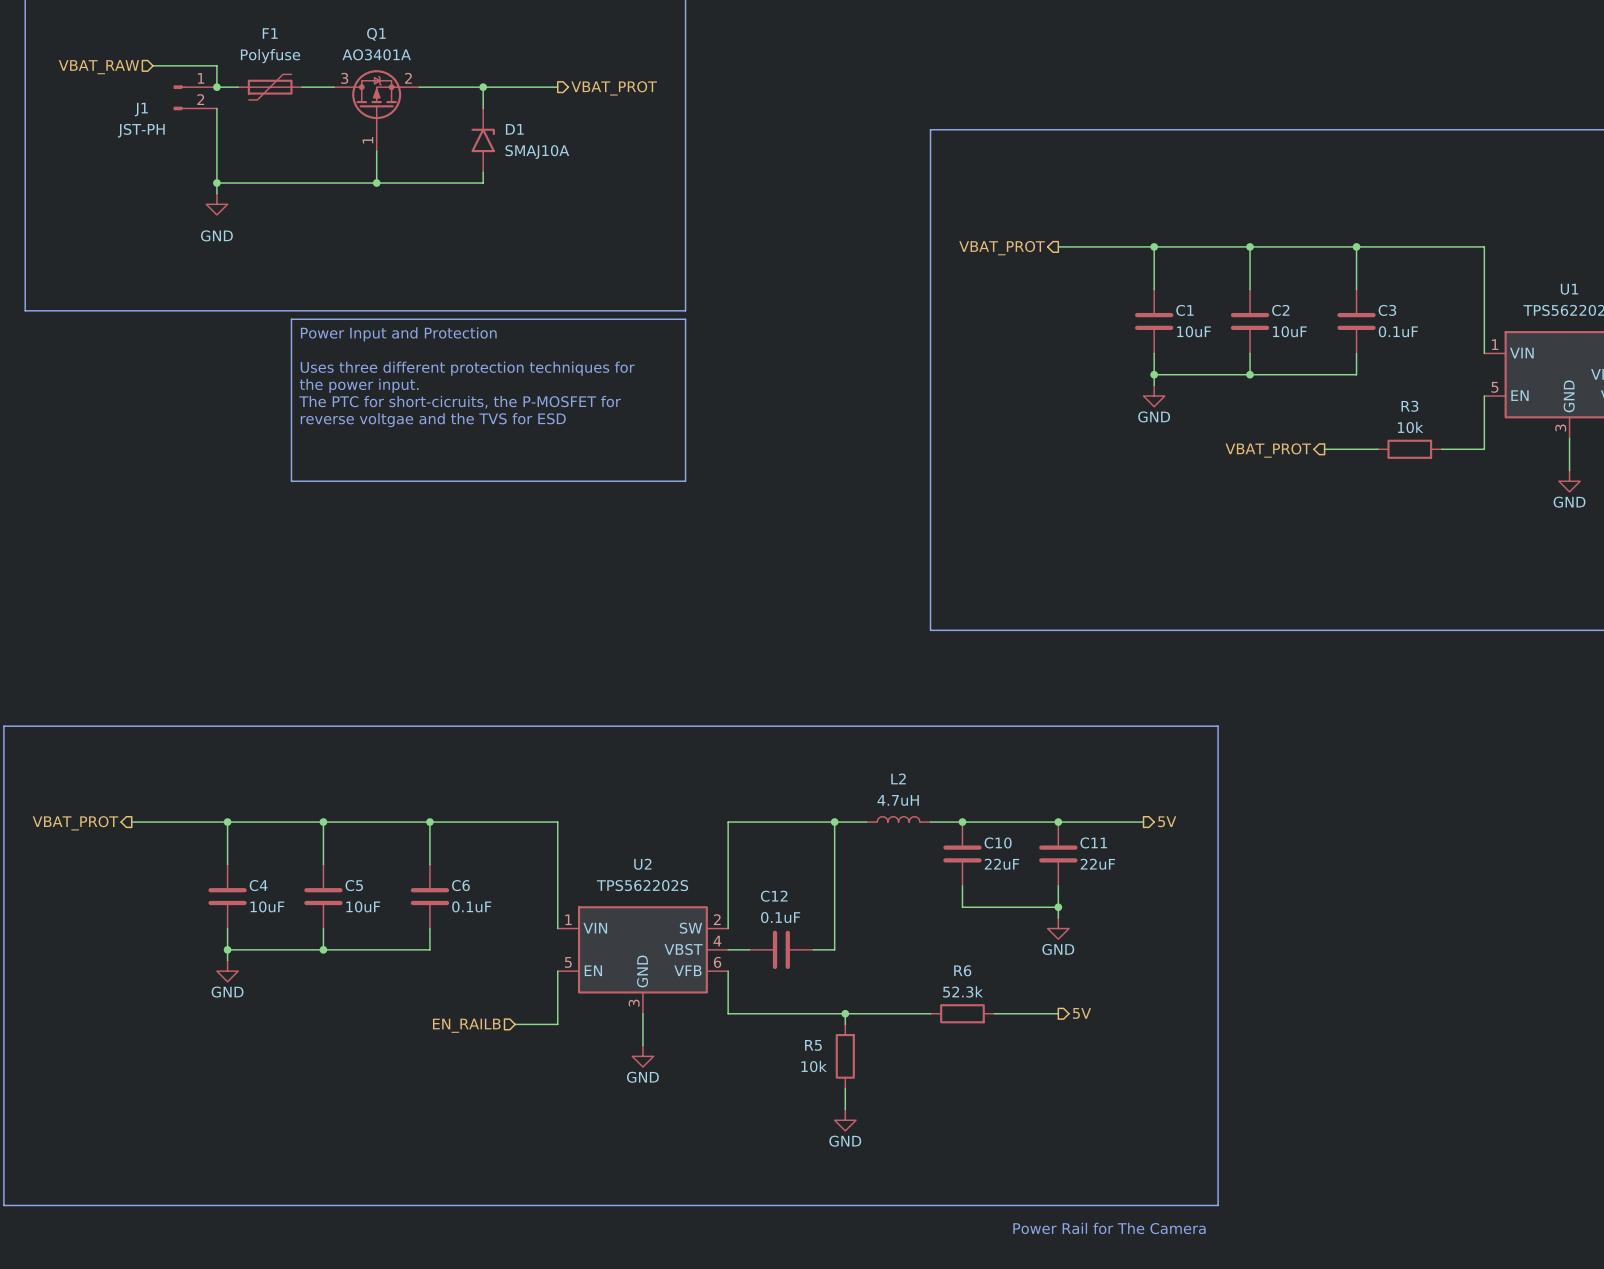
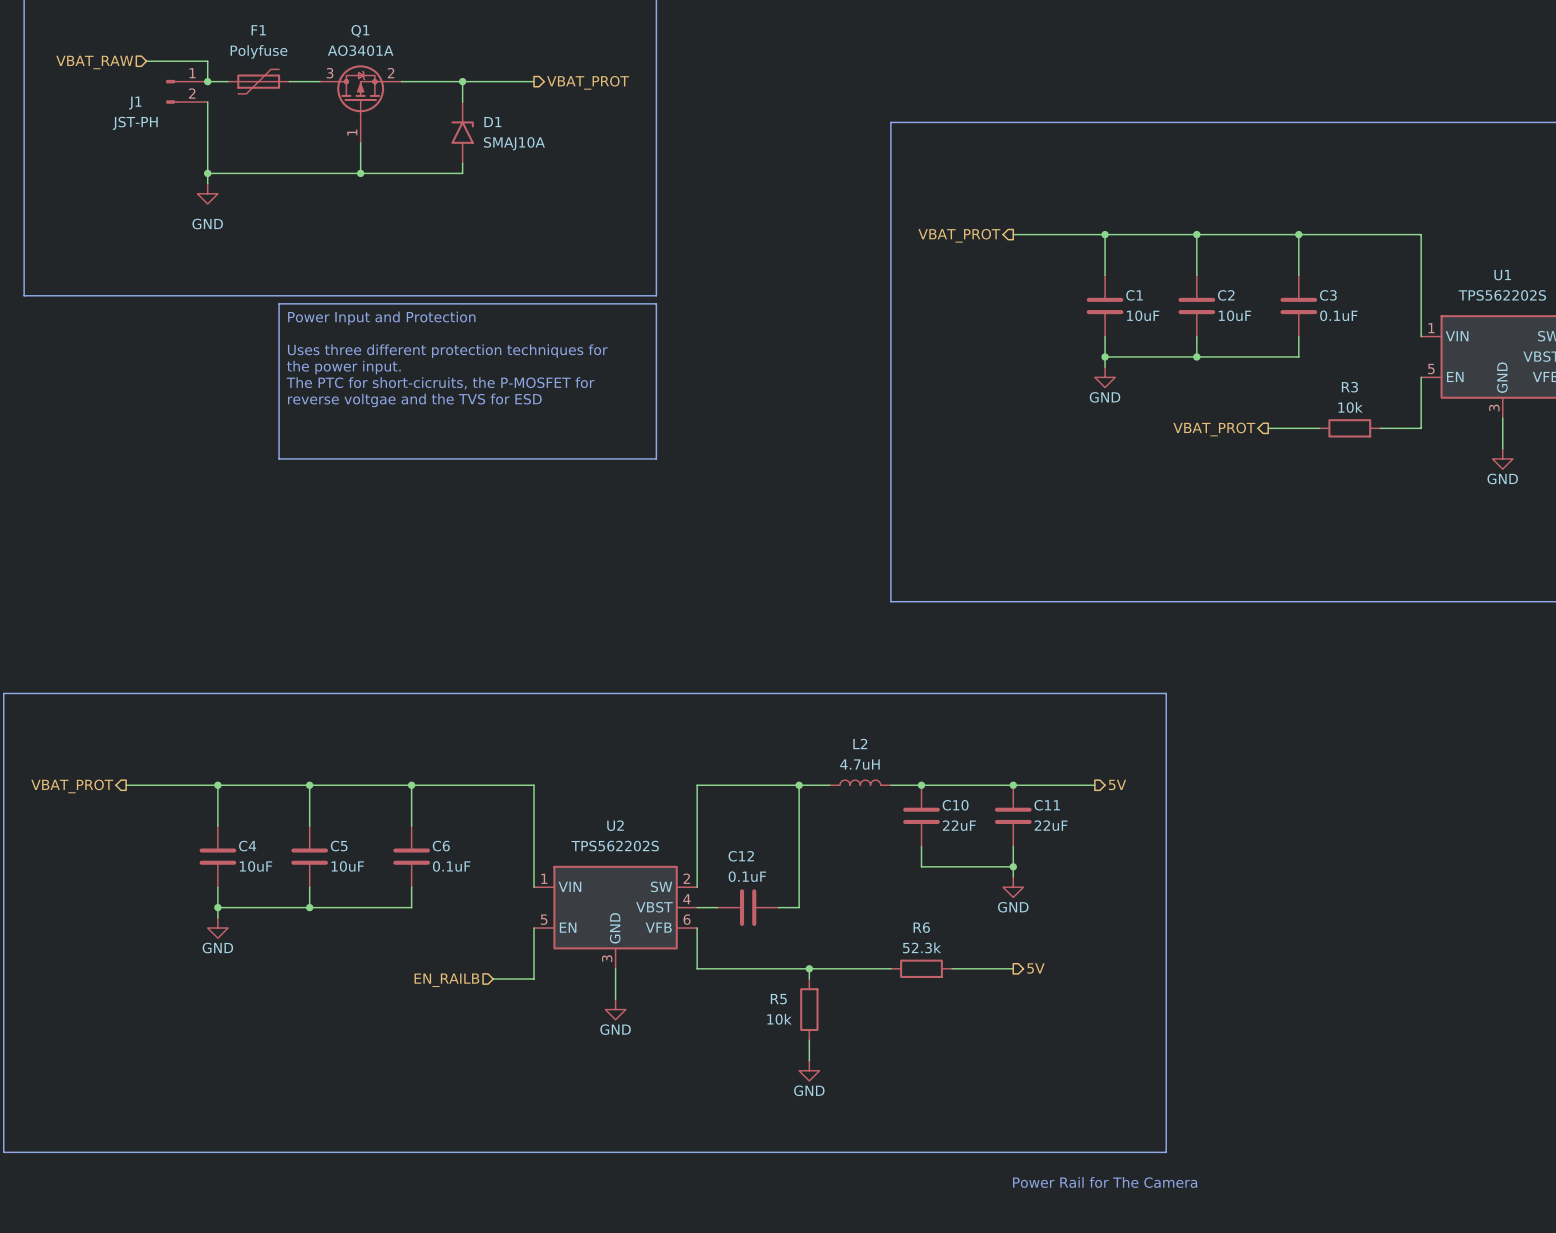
text position: Power Rail for The Camera (1109, 1228) -> Power Rail for The Camera (1105, 1182)

